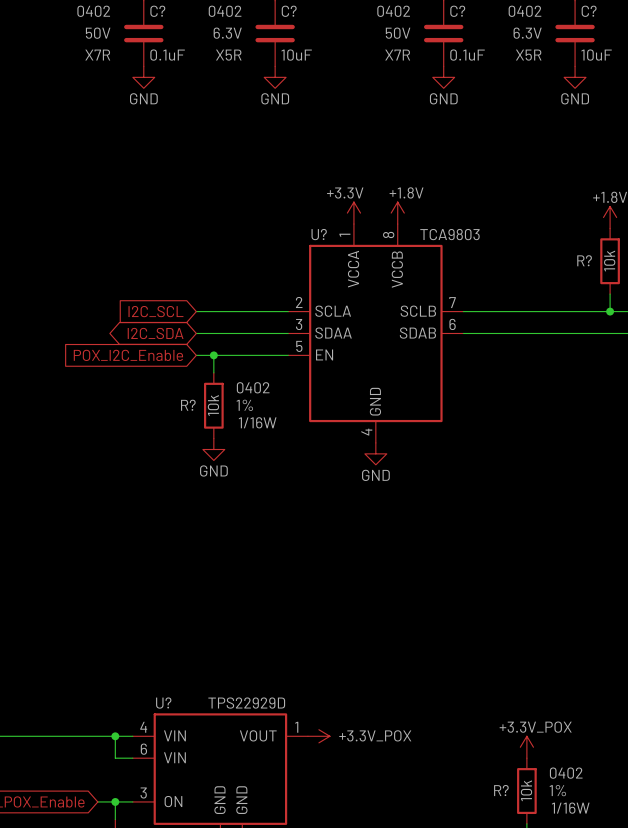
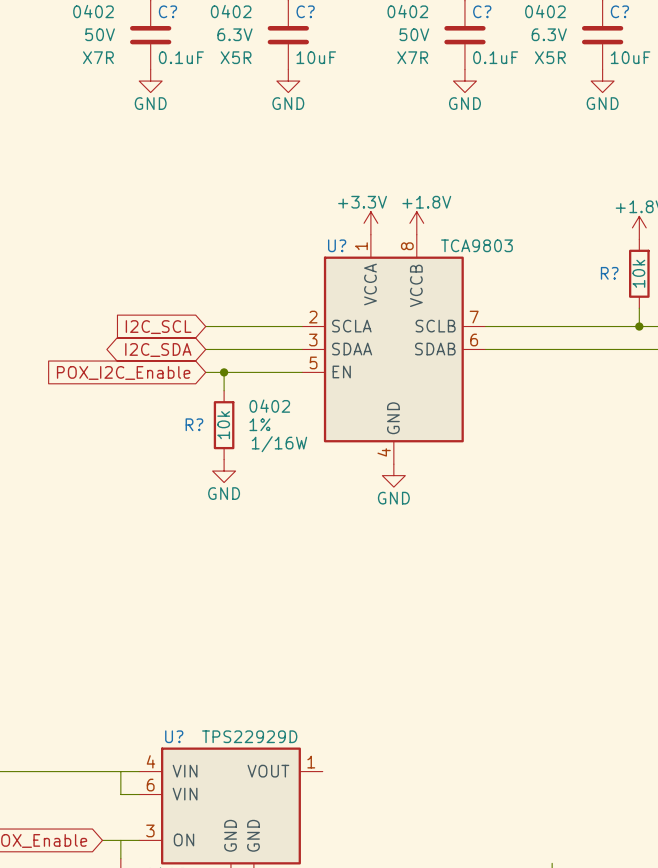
junction: (115, 736) -> none
power symbol: +3.3V_POX (318, 736) -> none
power symbol: +3.3V_POX (526, 747) -> none
R?: 10k (526, 791) -> none
junction: (115, 801) -> none

